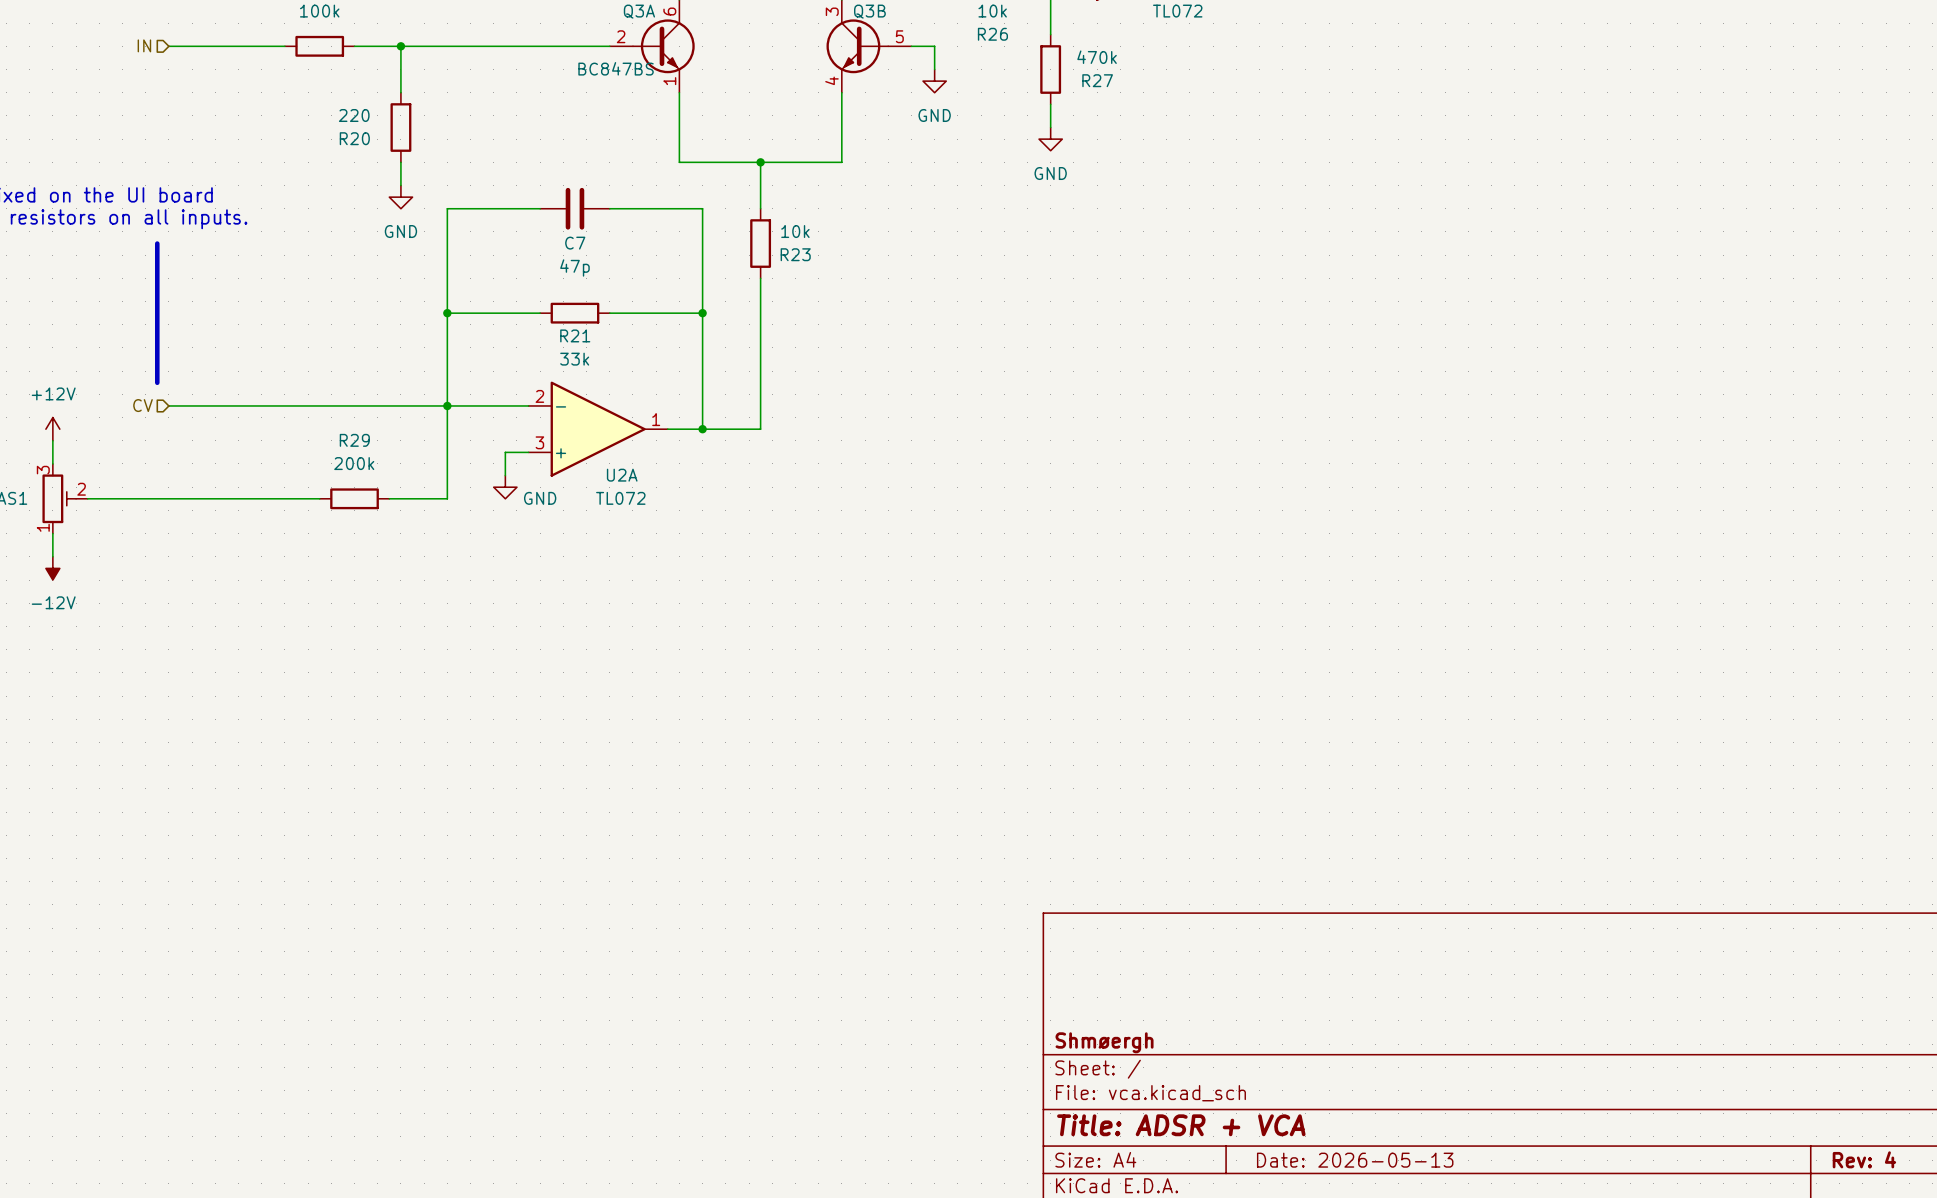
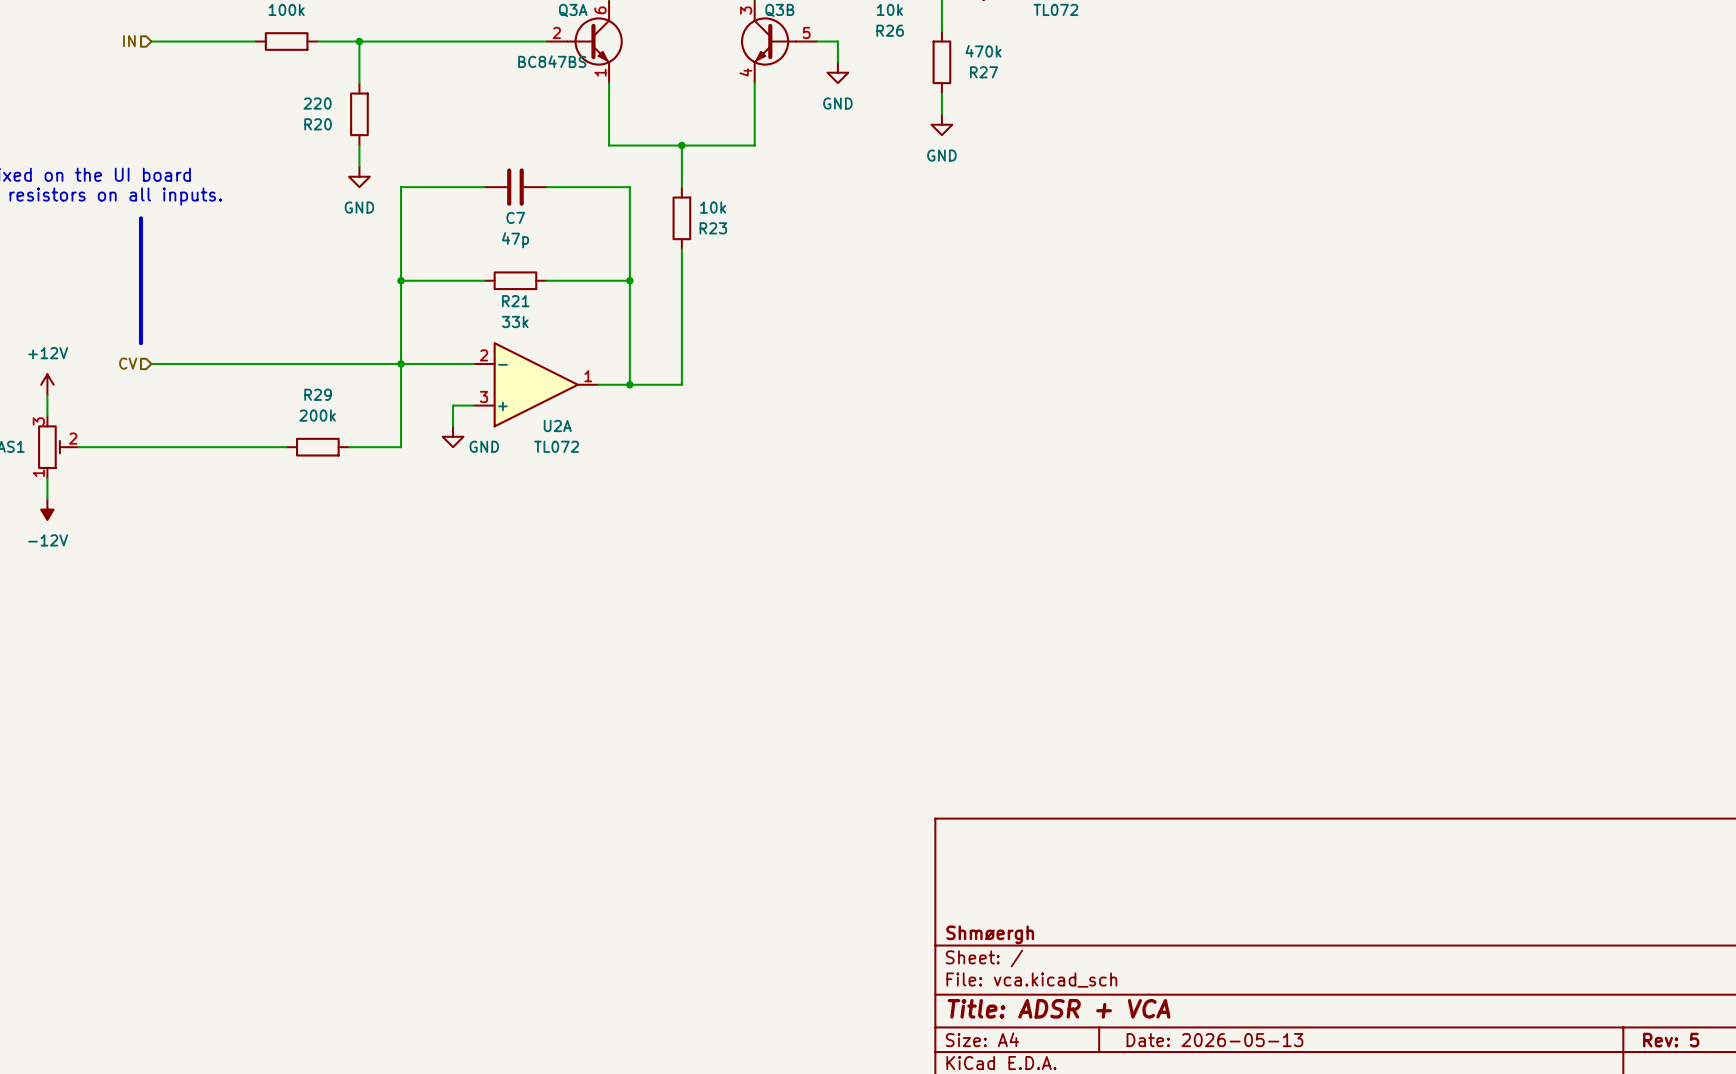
title block: Rev: 4 (1864, 1159) -> Rev: 5 (1671, 1040)

